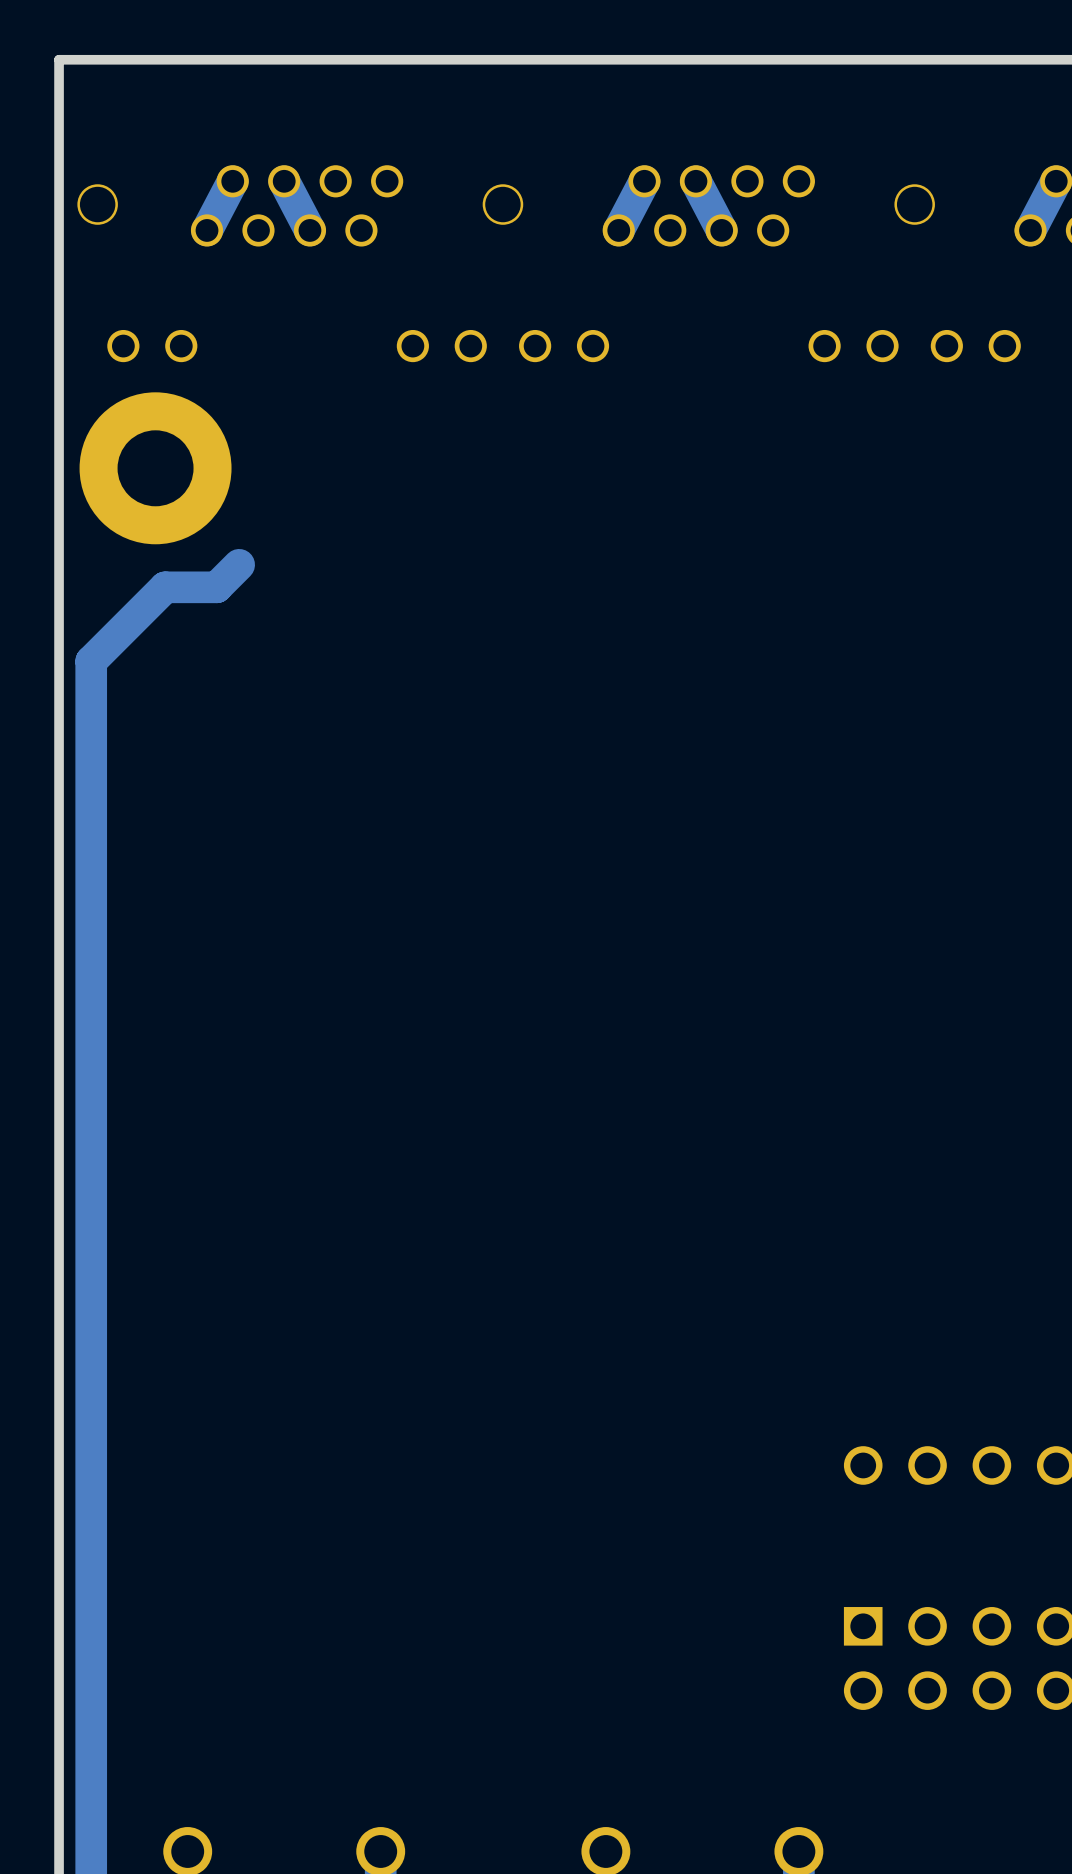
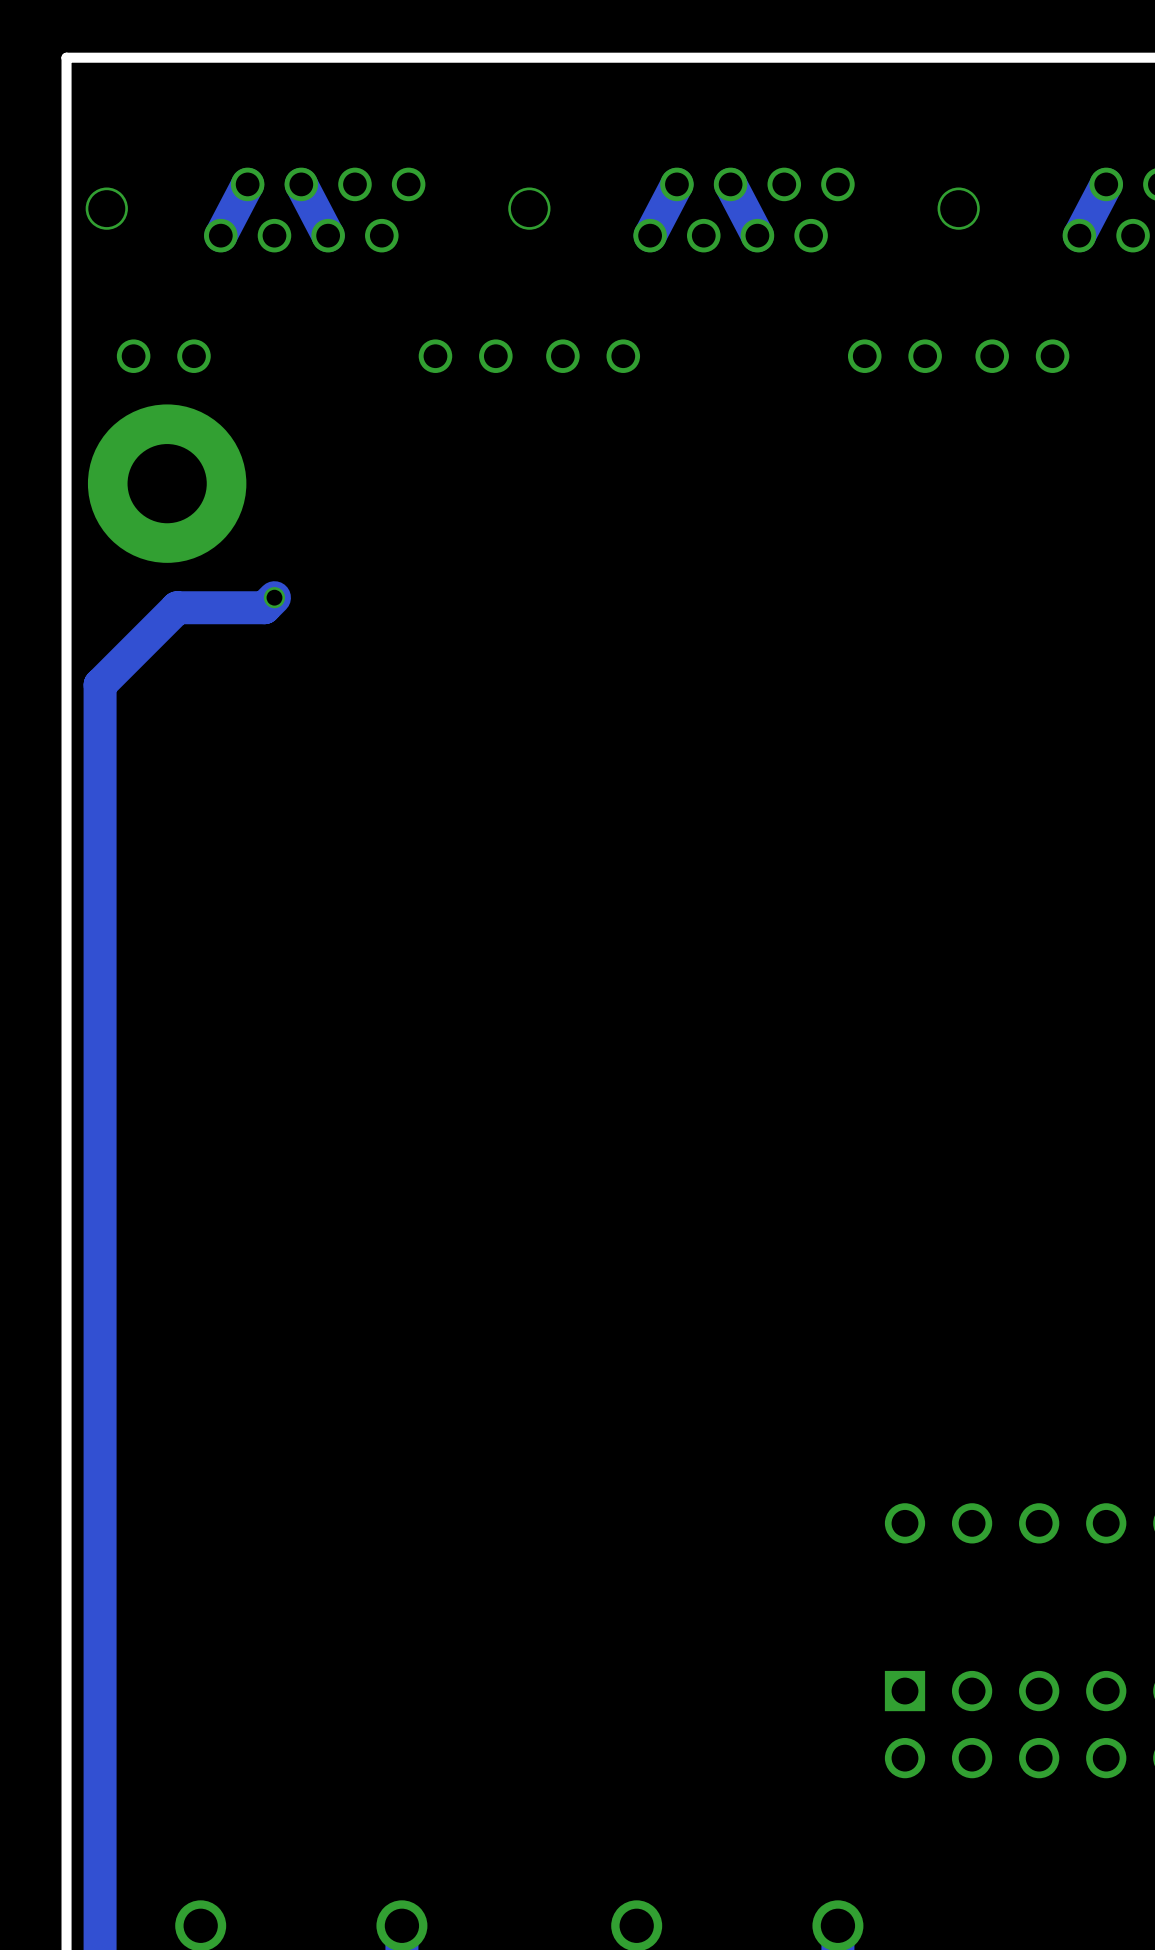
track: (239, 564) (216, 587) -> (274, 597) (264, 607) (230, 607)
via: none -> (274, 597)

